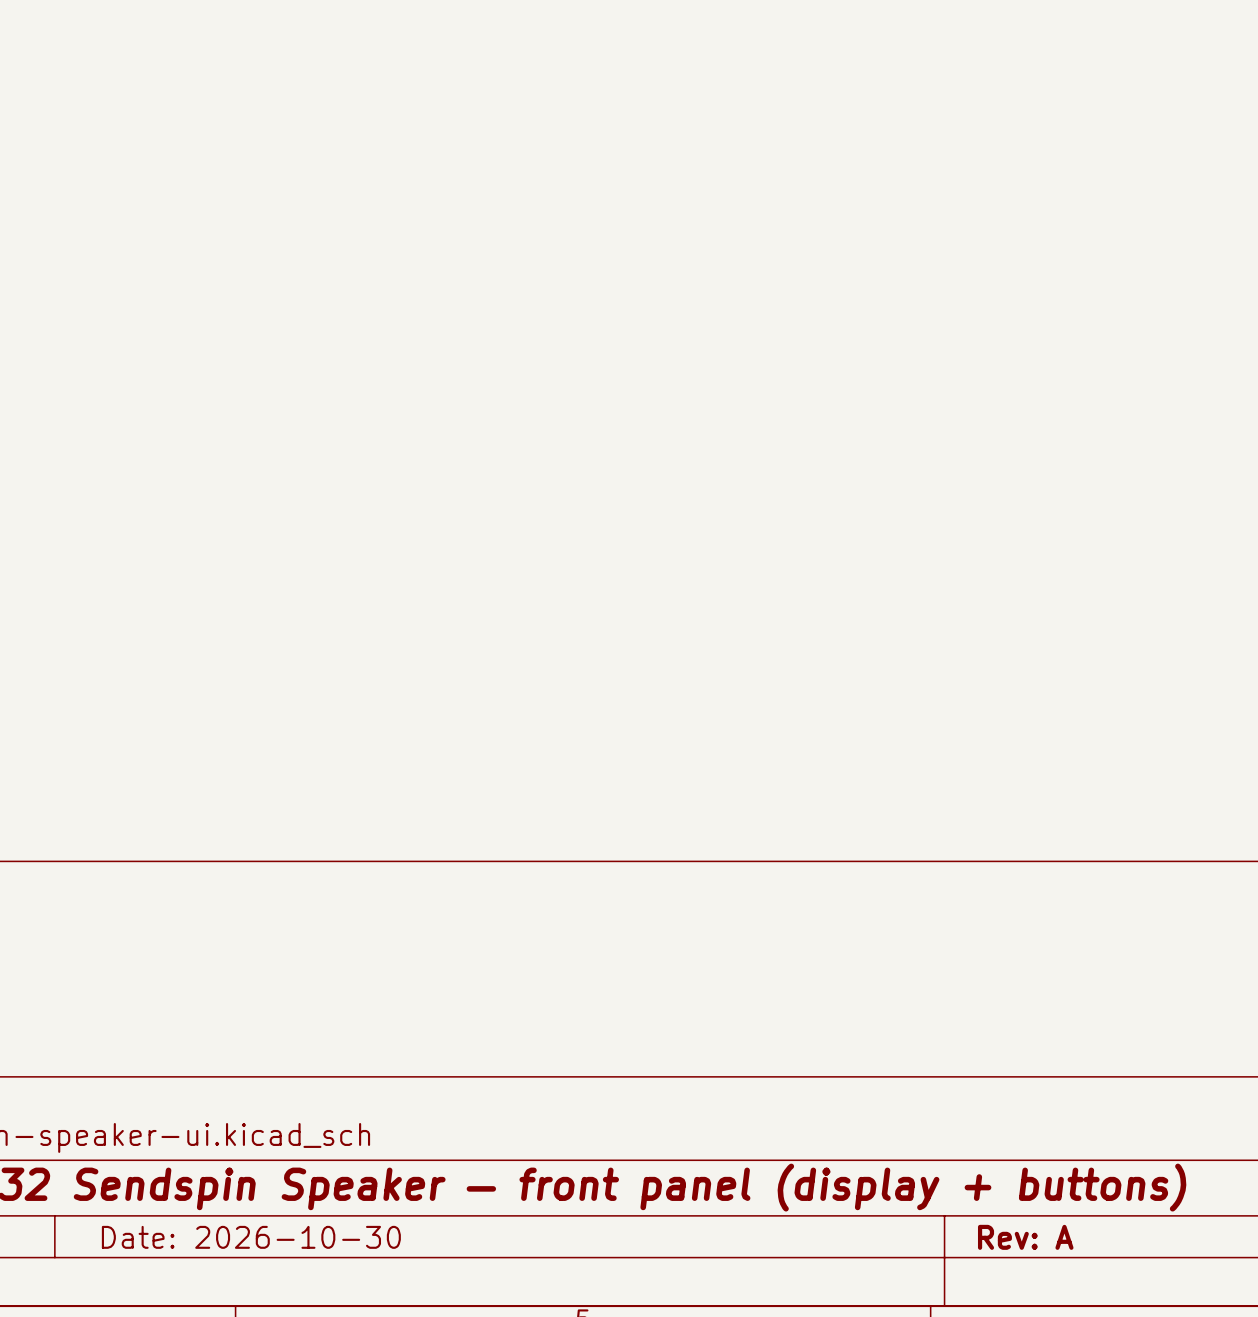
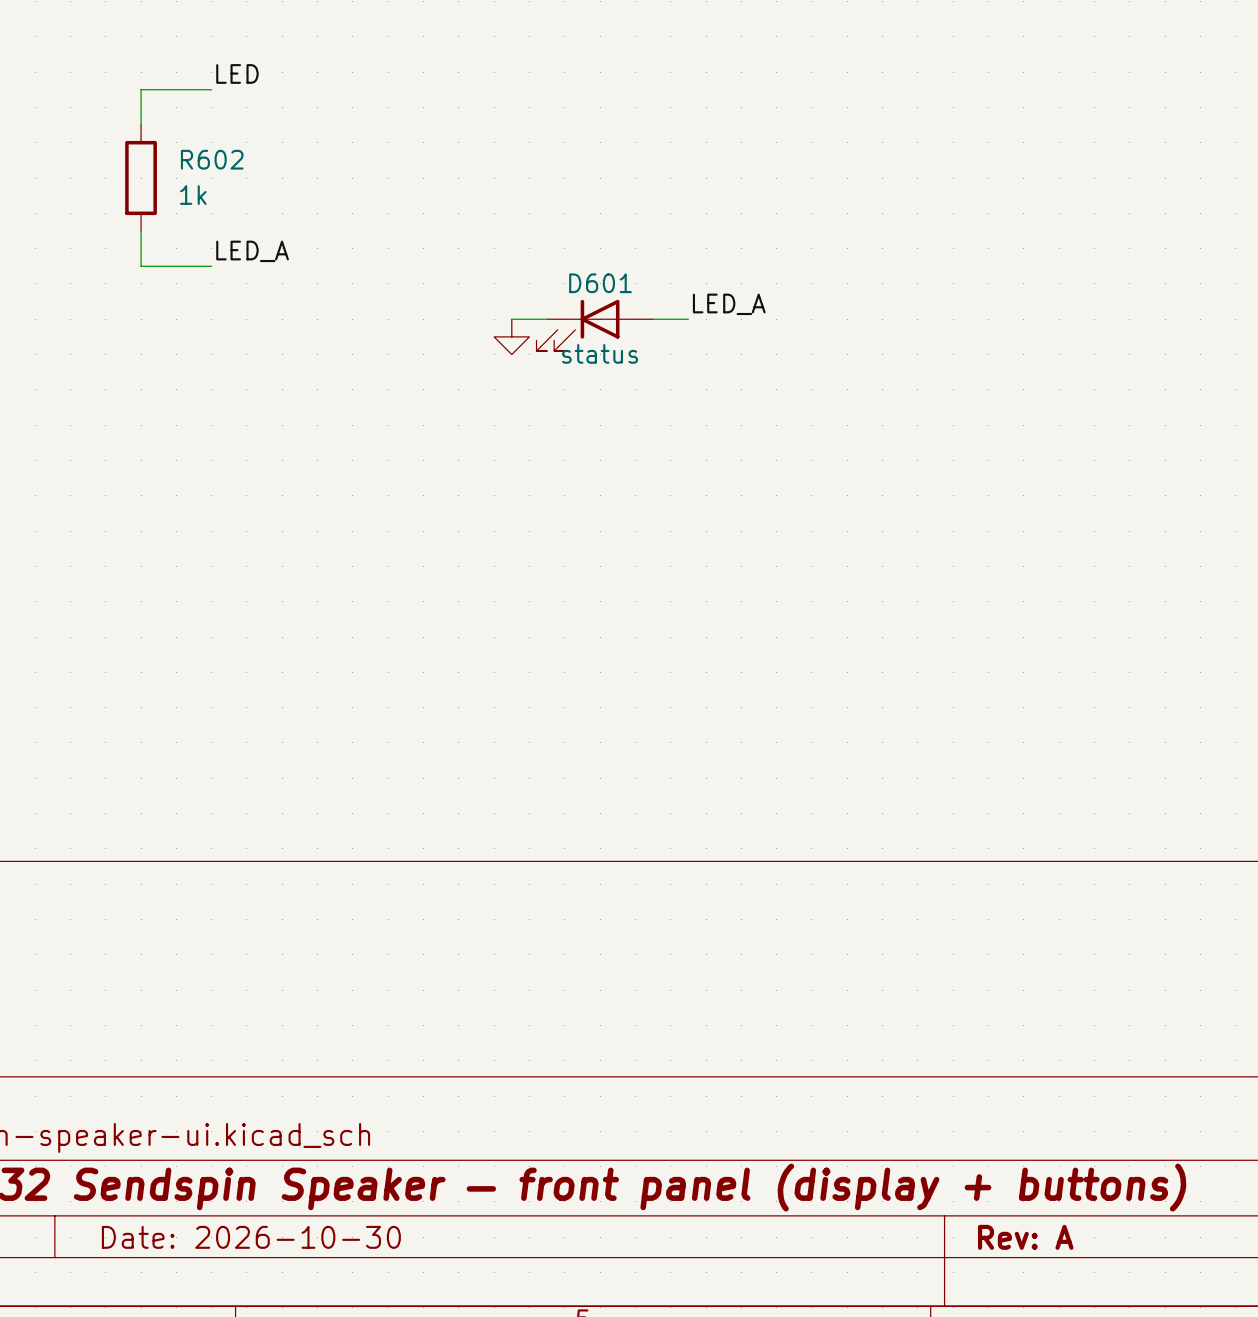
label: none -> LED (237, 73)
wire: none -> (211, 89) (141, 89) (141, 125)
R602: none -> 1k (141, 178)
wire: none -> (141, 230) (141, 266) (211, 266)
label: none -> LED_A (252, 251)
label: none -> LED_A (729, 304)
wire: none -> (511, 319) (547, 319)
wire: none -> (653, 319) (688, 319)
D601: none -> status (594, 325)
power symbol: none -> (511, 336)

